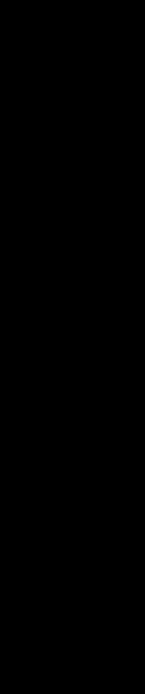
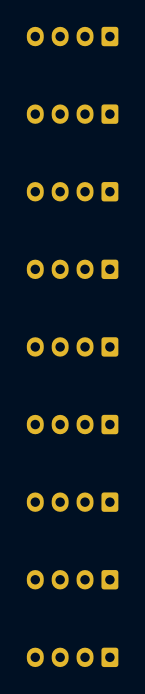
part: none -> (72, 36)
part: none -> (72, 114)
part: none -> (72, 191)
part: none -> (72, 269)
part: none -> (72, 346)
part: none -> (72, 424)
part: none -> (72, 502)
part: none -> (72, 579)
part: none -> (72, 657)

